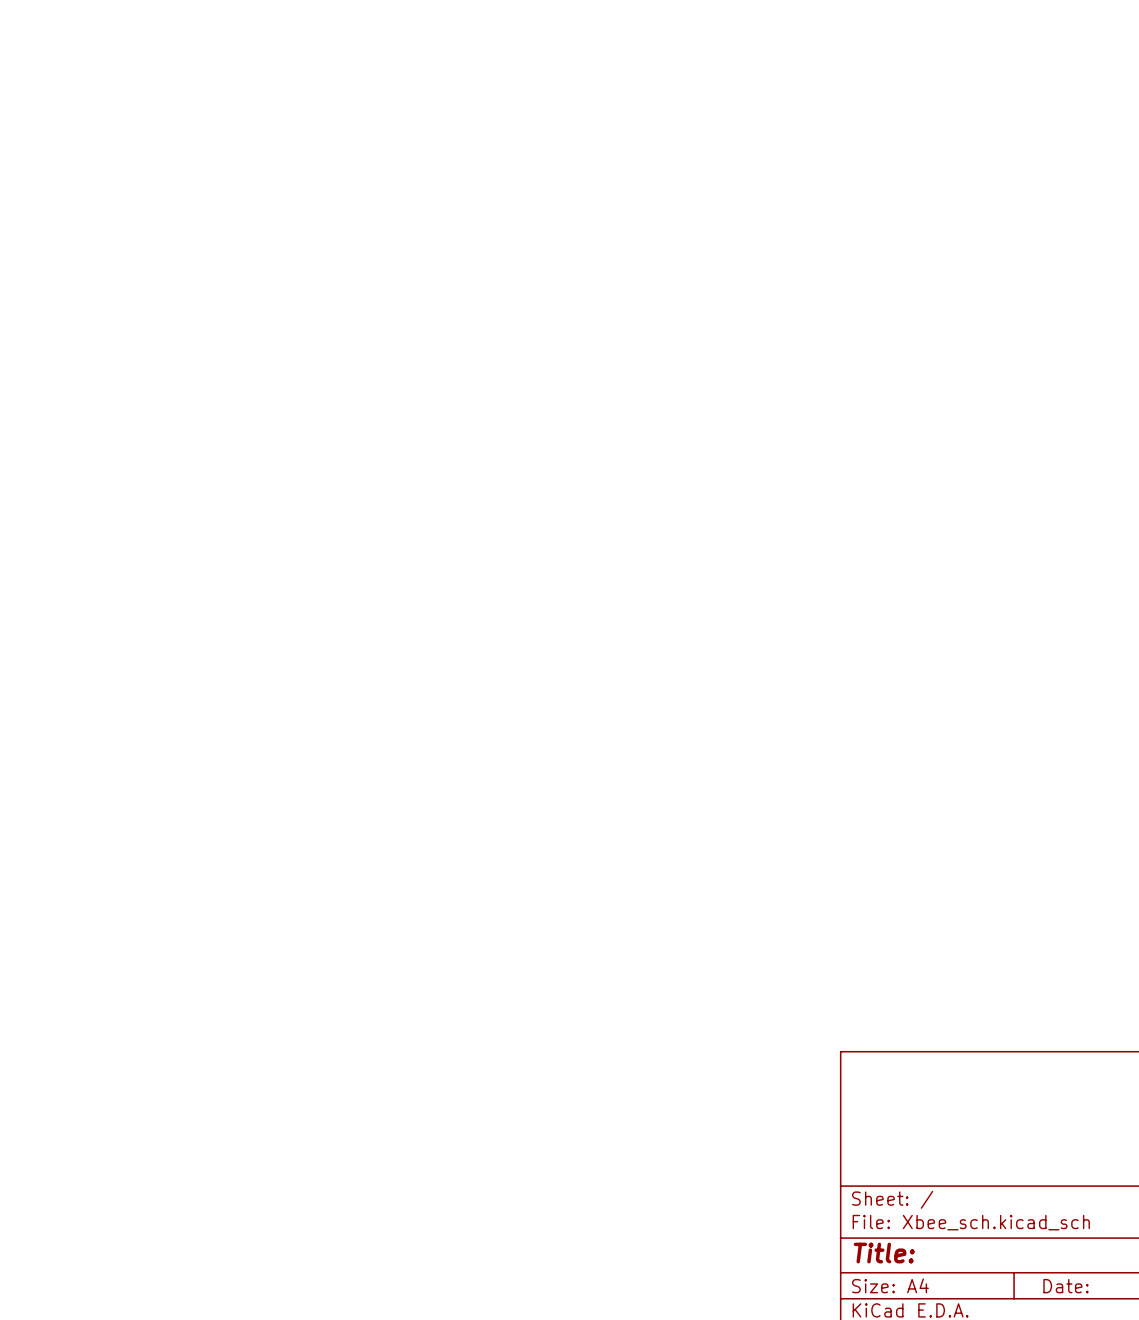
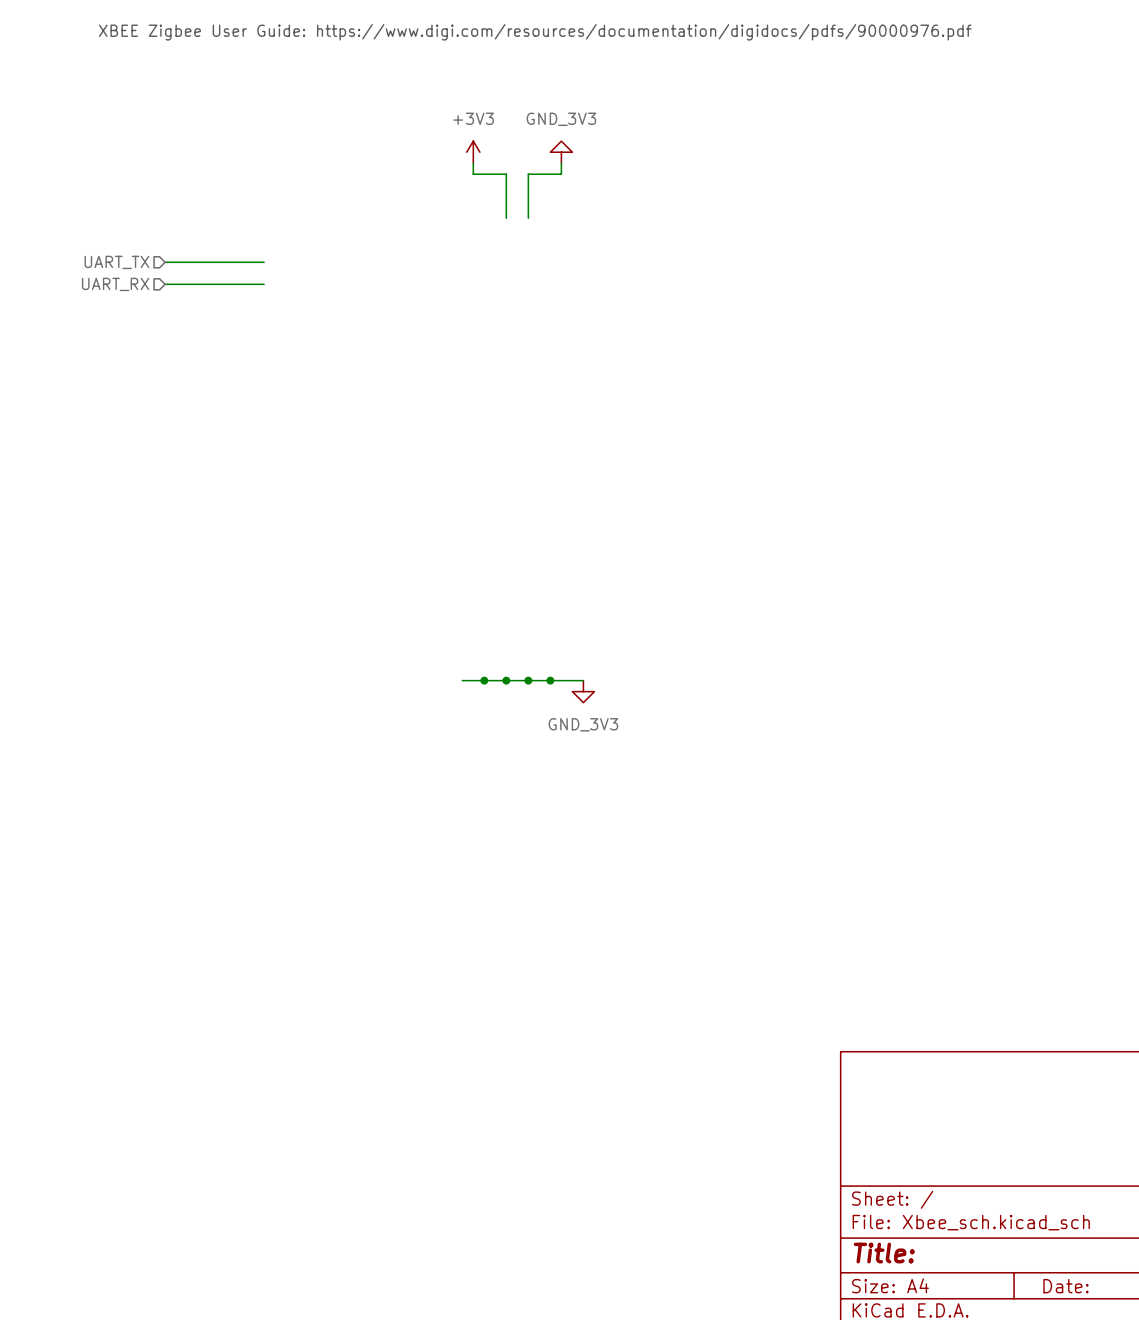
text: none -> XBEE Zigbee User Guide: https://www.digi.com/resources/documentation/digidocs/pdfs/90000976.pdf (535, 32)
power symbol: none -> +3V3 (473, 152)
power symbol: none -> GND_3V3 (561, 152)
wire: none -> (473, 163) (473, 174) (506, 174) (506, 218)
wire: none -> (561, 163) (561, 174) (528, 174) (528, 218)
hierarchical label: none -> UART_TX (116, 262)
wire: none -> (165, 262) (264, 262)
hierarchical label: none -> UART_RX (115, 284)
wire: none -> (165, 284) (264, 284)
wire: none -> (462, 680) (583, 680)
junction: none -> (484, 680)
junction: none -> (506, 680)
junction: none -> (528, 680)
junction: none -> (550, 680)
power symbol: none -> GND_3V3 (583, 691)

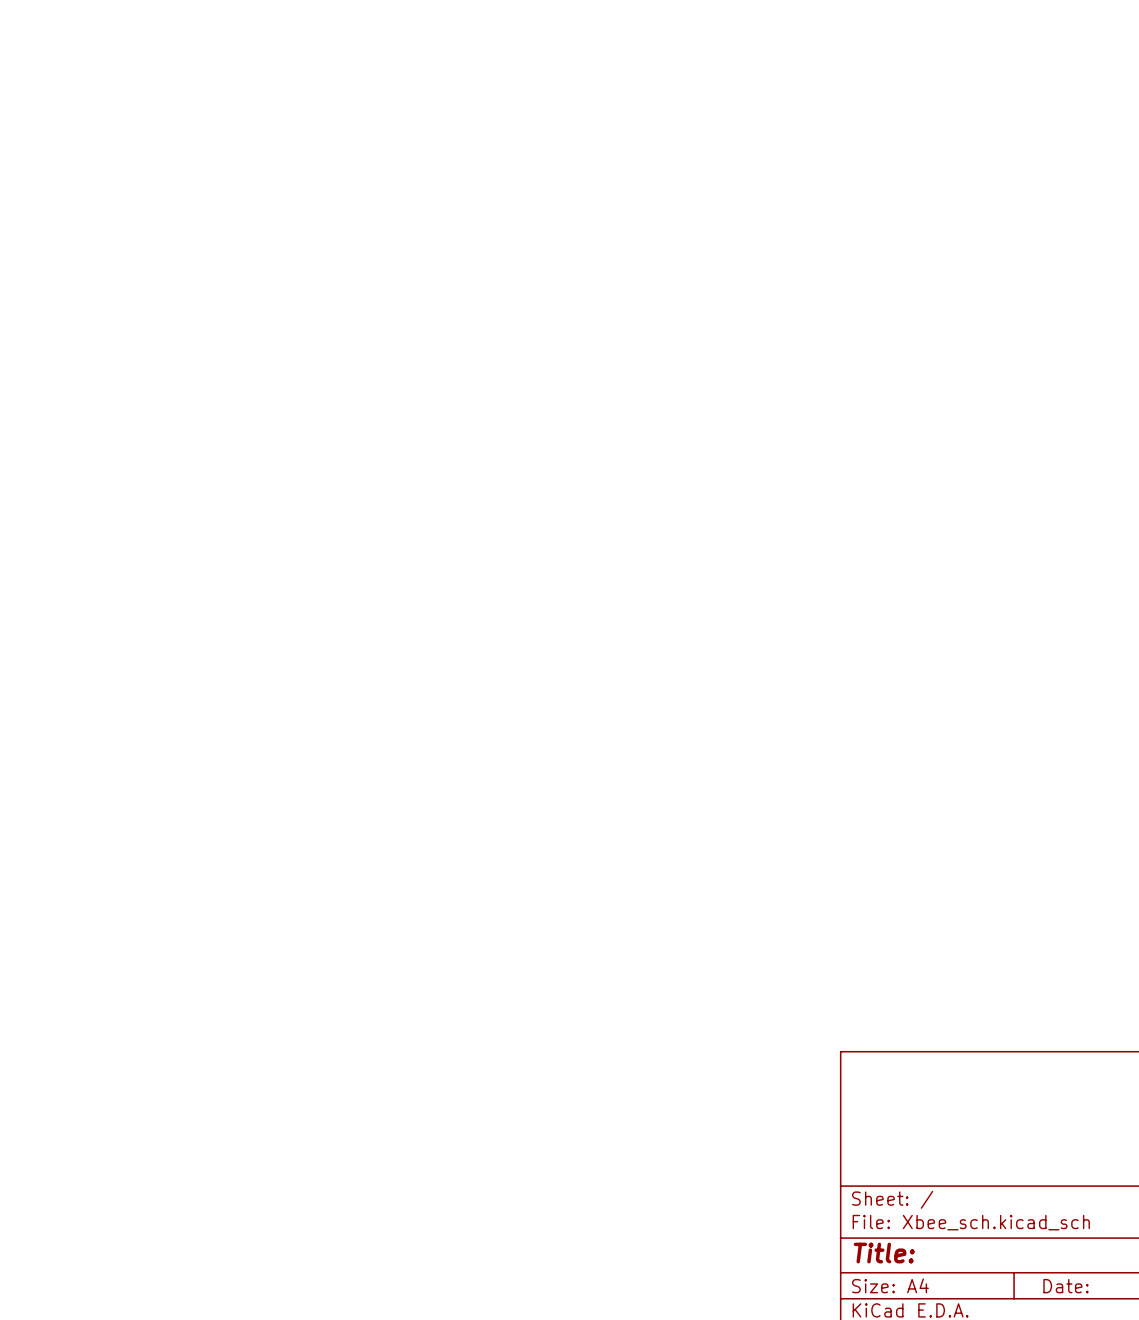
text: XBEE Zigbee User Guide: https://www.digi.com/resources/documentation/digidocs/pdfs/90000976.pdf (535, 32) -> none
power symbol: +3V3 (473, 152) -> none
power symbol: GND_3V3 (561, 152) -> none
wire: (473, 163) (473, 174) (506, 174) (506, 218) -> none
wire: (561, 163) (561, 174) (528, 174) (528, 218) -> none
hierarchical label: UART_TX (116, 262) -> none
wire: (165, 262) (264, 262) -> none
hierarchical label: UART_RX (115, 284) -> none
wire: (165, 284) (264, 284) -> none
wire: (462, 680) (583, 680) -> none
junction: (484, 680) -> none
junction: (506, 680) -> none
junction: (528, 680) -> none
junction: (550, 680) -> none
power symbol: GND_3V3 (583, 691) -> none

